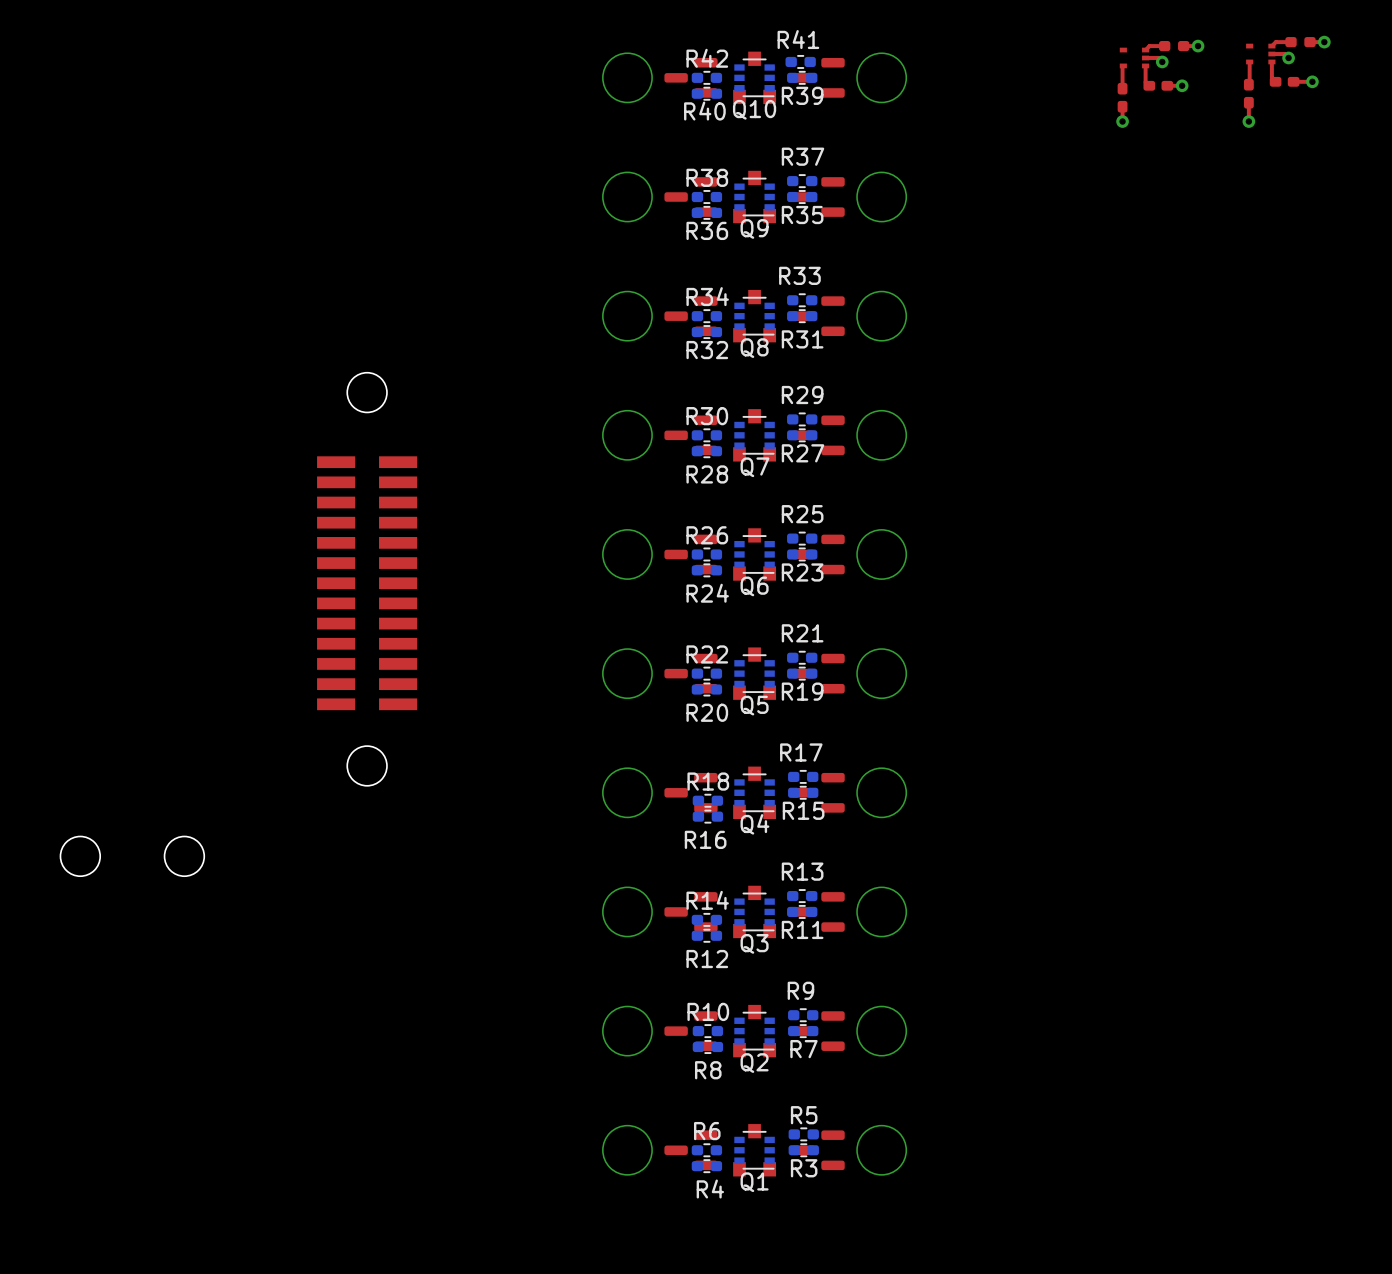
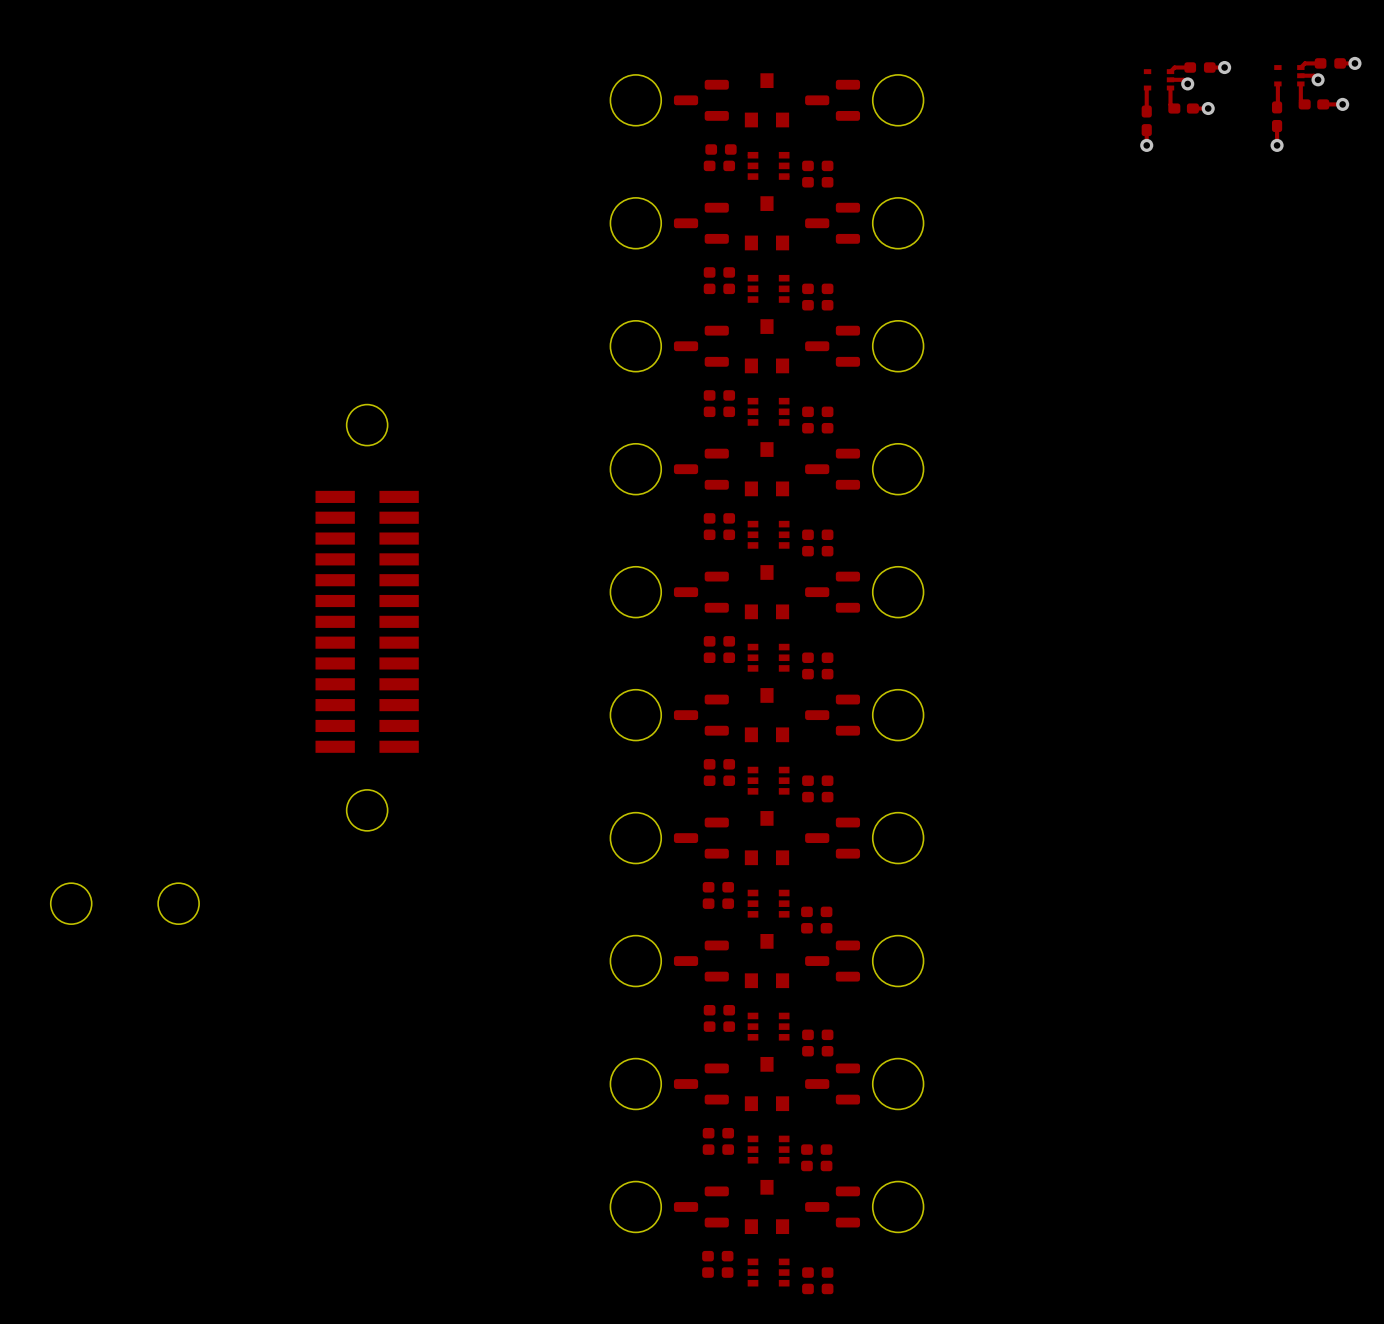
R41 side: bottom (800, 61) -> top (720, 149)
R42 side: bottom (706, 77) -> top (817, 165)
Q10 side: bottom (754, 77) -> top (768, 165)
R39 side: bottom (802, 77) -> top (719, 165)
R40 side: bottom (706, 93) -> top (817, 182)
R37 side: bottom (802, 181) -> top (719, 272)
R38 side: bottom (706, 197) -> top (817, 288)
Q9 side: bottom (754, 197) -> top (768, 288)
R35 side: bottom (802, 197) -> top (719, 288)
R36 side: bottom (706, 212) -> top (817, 305)
R33 side: bottom (802, 300) -> top (719, 395)
R34 side: bottom (706, 316) -> top (817, 411)
Q8 side: bottom (754, 316) -> top (768, 411)
R31 side: bottom (802, 316) -> top (719, 411)
R32 side: bottom (706, 332) -> top (817, 428)
R29 side: bottom (802, 419) -> top (719, 518)
R30 side: bottom (706, 435) -> top (817, 534)
Q7 side: bottom (754, 435) -> top (768, 534)
R27 side: bottom (802, 435) -> top (719, 534)
R28 side: bottom (706, 451) -> top (817, 551)
R25 side: bottom (802, 538) -> top (719, 641)
R26 side: bottom (706, 554) -> top (817, 657)
Q6 side: bottom (754, 554) -> top (768, 657)
R23 side: bottom (802, 554) -> top (719, 657)
R24 side: bottom (706, 570) -> top (817, 674)
R21 side: bottom (802, 657) -> top (719, 764)
R22 side: bottom (706, 673) -> top (817, 780)
Q5 side: bottom (754, 673) -> top (768, 780)
R19 side: bottom (802, 673) -> top (719, 780)
R20 side: bottom (706, 689) -> top (817, 797)
R17 side: bottom (803, 776) -> top (718, 887)
Q4 side: bottom (754, 792) -> top (768, 903)
R15 side: bottom (803, 792) -> top (718, 903)
R18 side: bottom (707, 800) -> top (816, 911)
R16 side: bottom (707, 816) -> top (816, 928)
R13 side: bottom (802, 896) -> top (719, 1010)
Q3 side: bottom (754, 911) -> top (768, 1026)
R11 side: bottom (802, 911) -> top (719, 1026)
R14 side: bottom (706, 919) -> top (817, 1034)
R12 side: bottom (706, 935) -> top (817, 1051)
R9 side: bottom (803, 1015) -> top (718, 1133)
R10 side: bottom (707, 1031) -> top (816, 1149)
Q2 side: bottom (754, 1031) -> top (768, 1149)
R7 side: bottom (803, 1031) -> top (718, 1149)
R8 side: bottom (707, 1047) -> top (816, 1165)
R5 side: bottom (803, 1134) -> top (717, 1256)
R6 side: bottom (706, 1150) -> top (817, 1272)
Q1 side: bottom (754, 1150) -> top (768, 1272)
R3 side: bottom (803, 1150) -> top (717, 1272)
R4 side: bottom (706, 1166) -> top (817, 1288)

